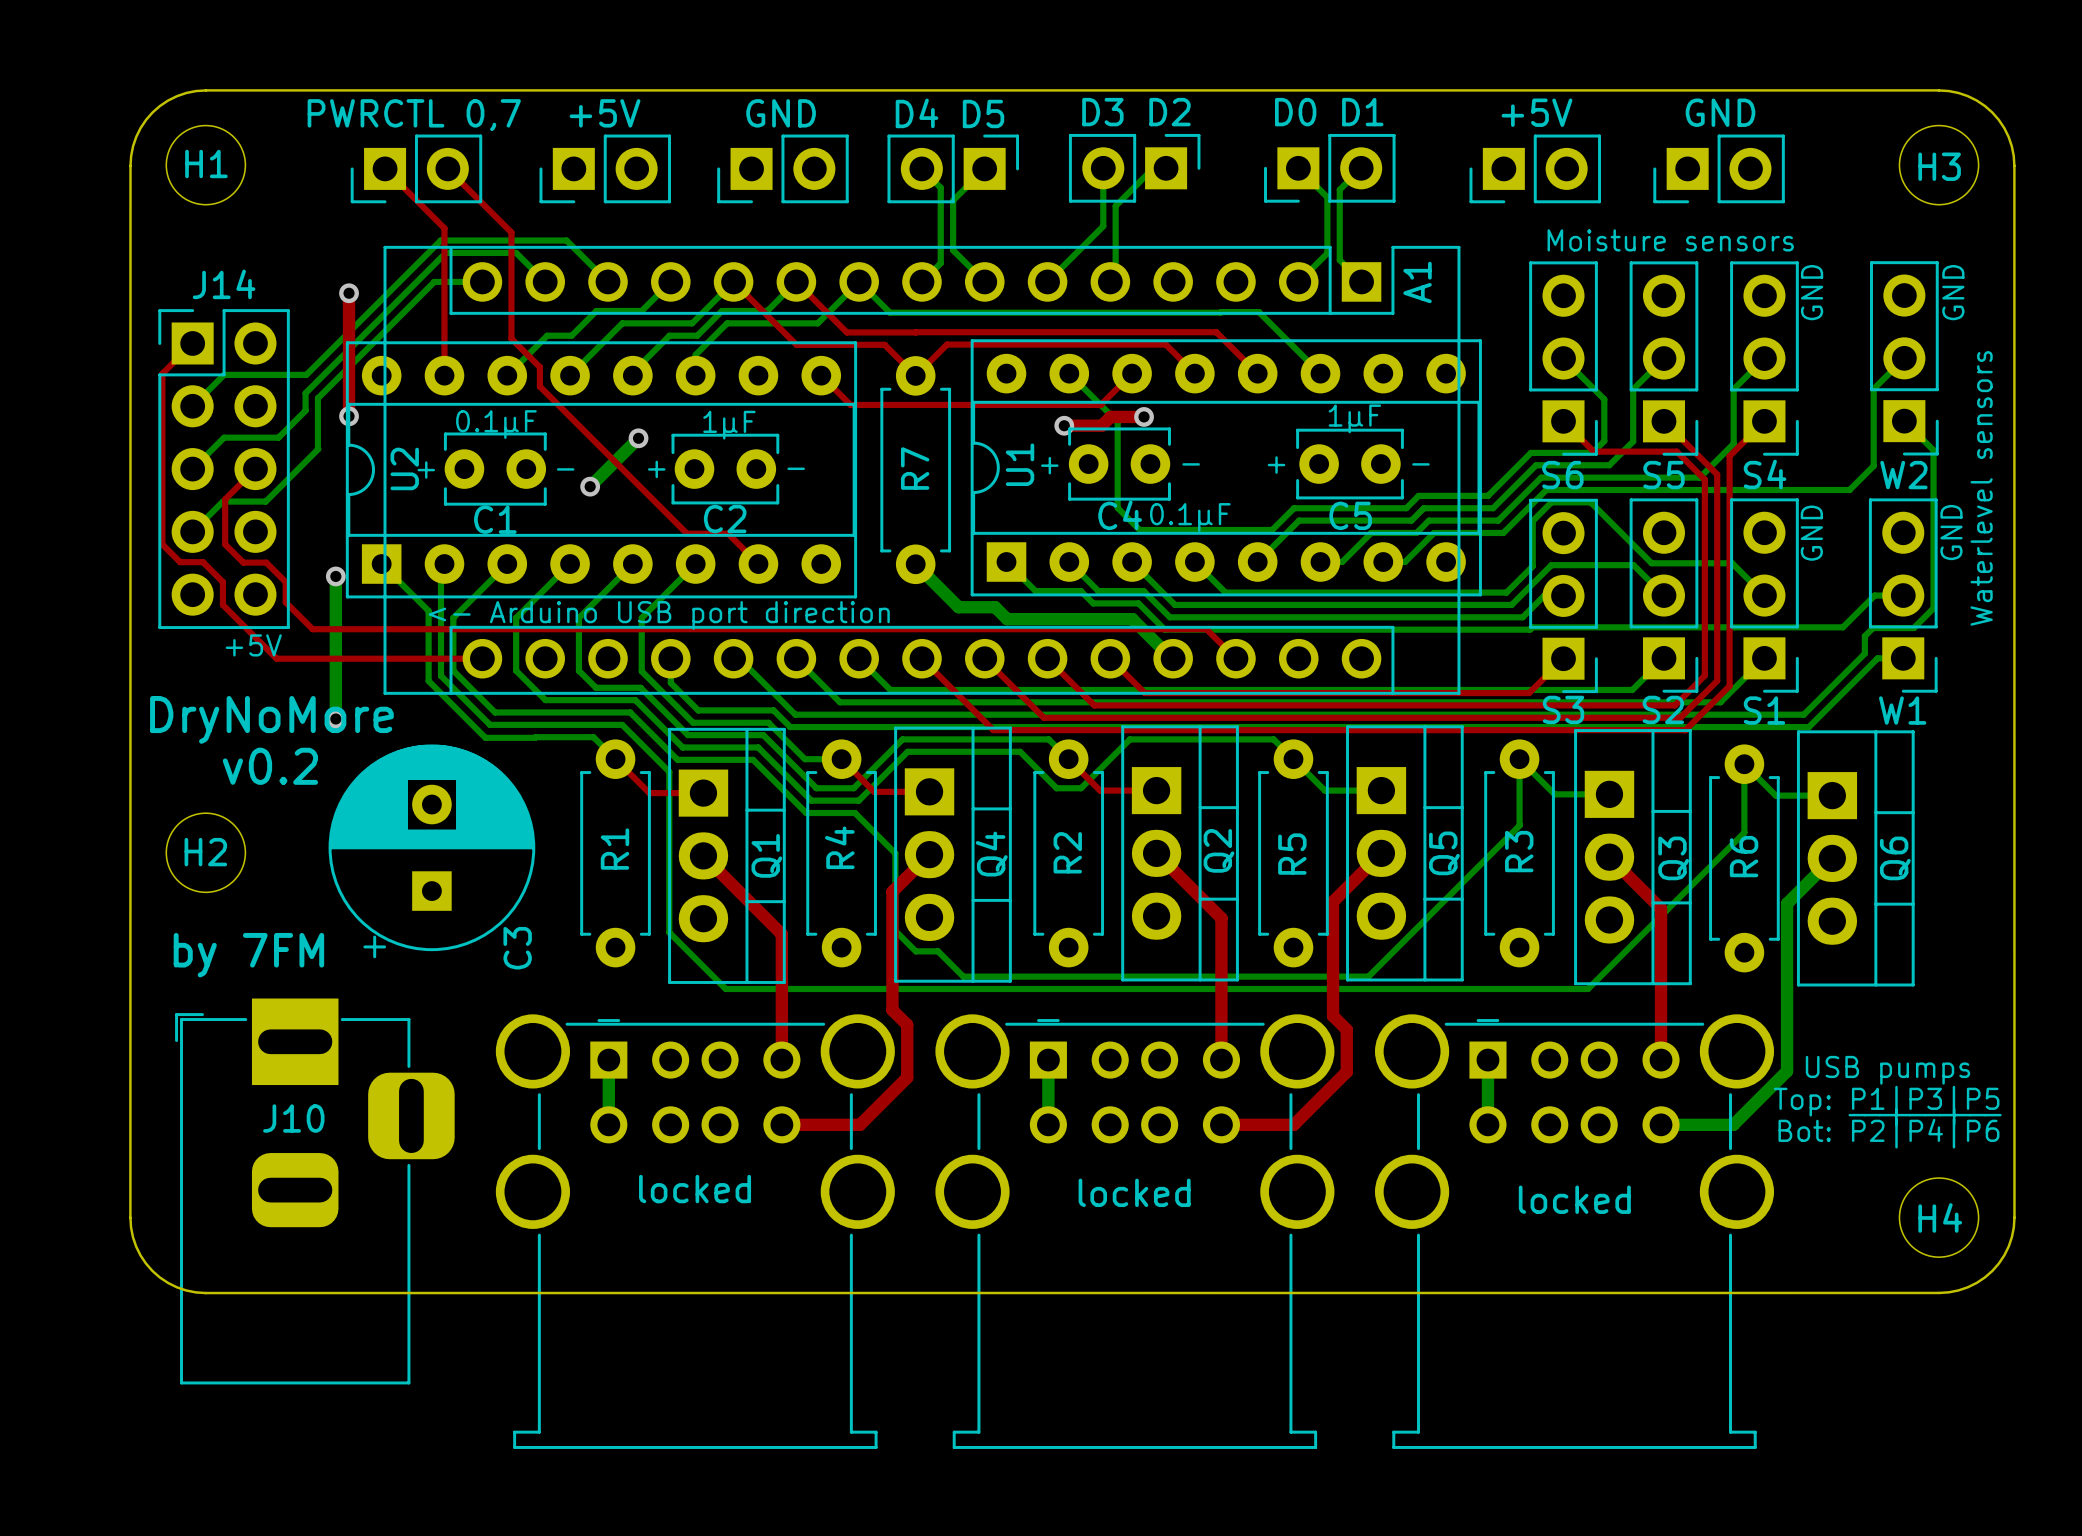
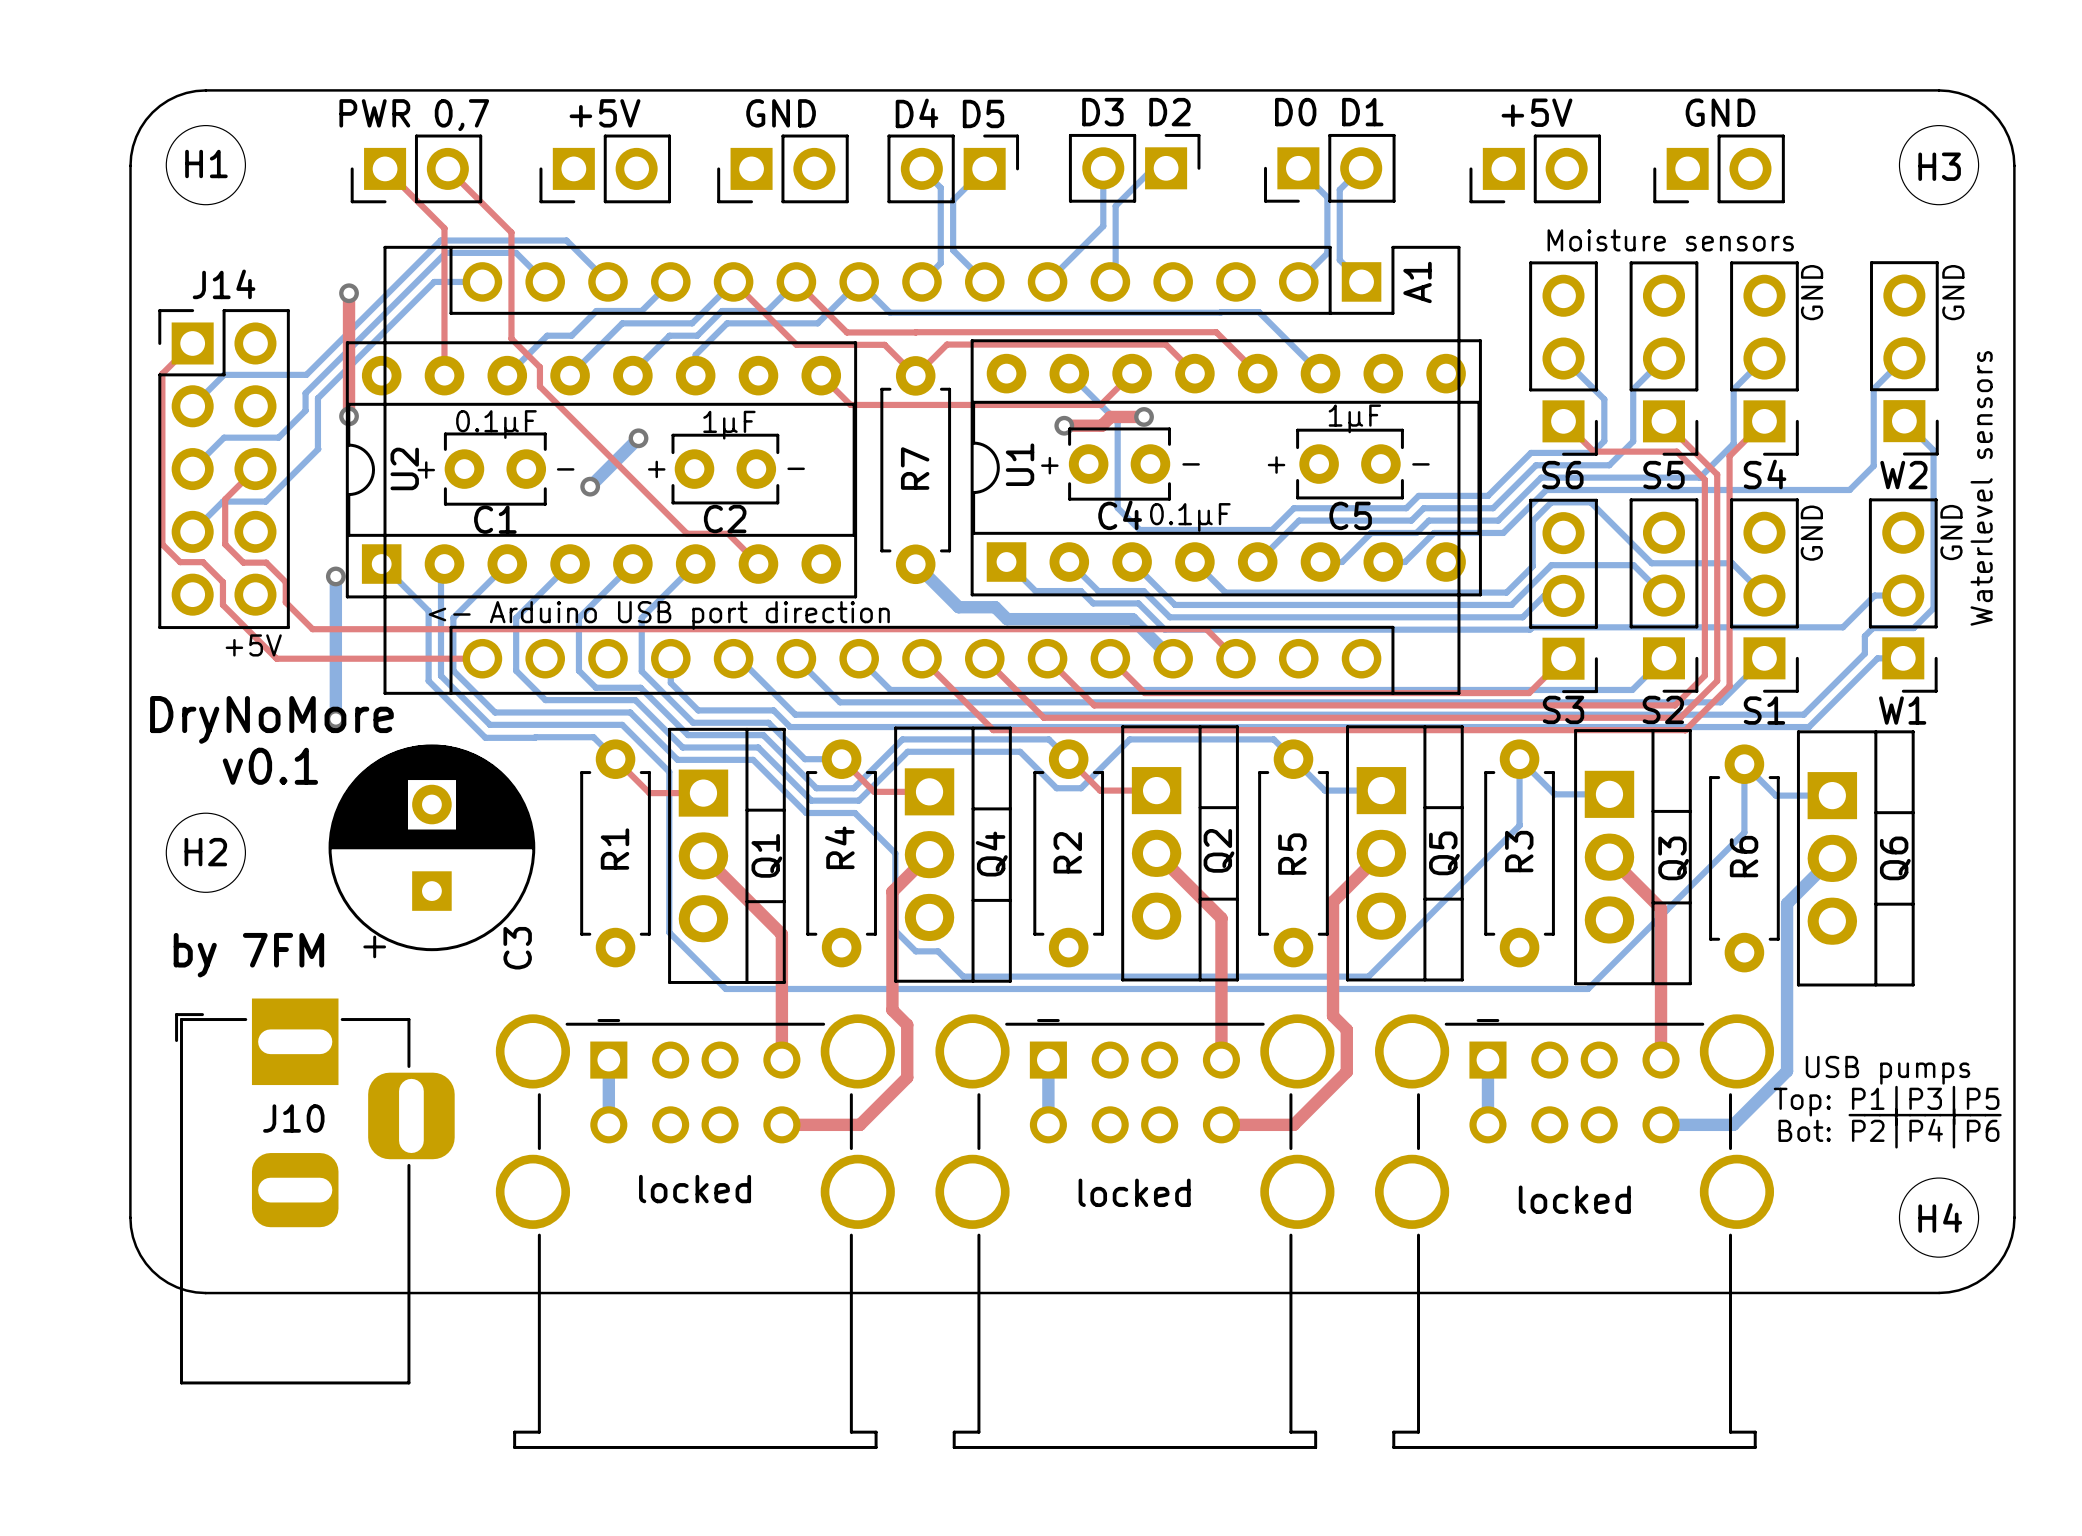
text: PWRCTL 0,7 (414, 115) -> PWR 0,7 (414, 115)
text: v0.2 (270, 766) -> v0.1 (270, 766)

